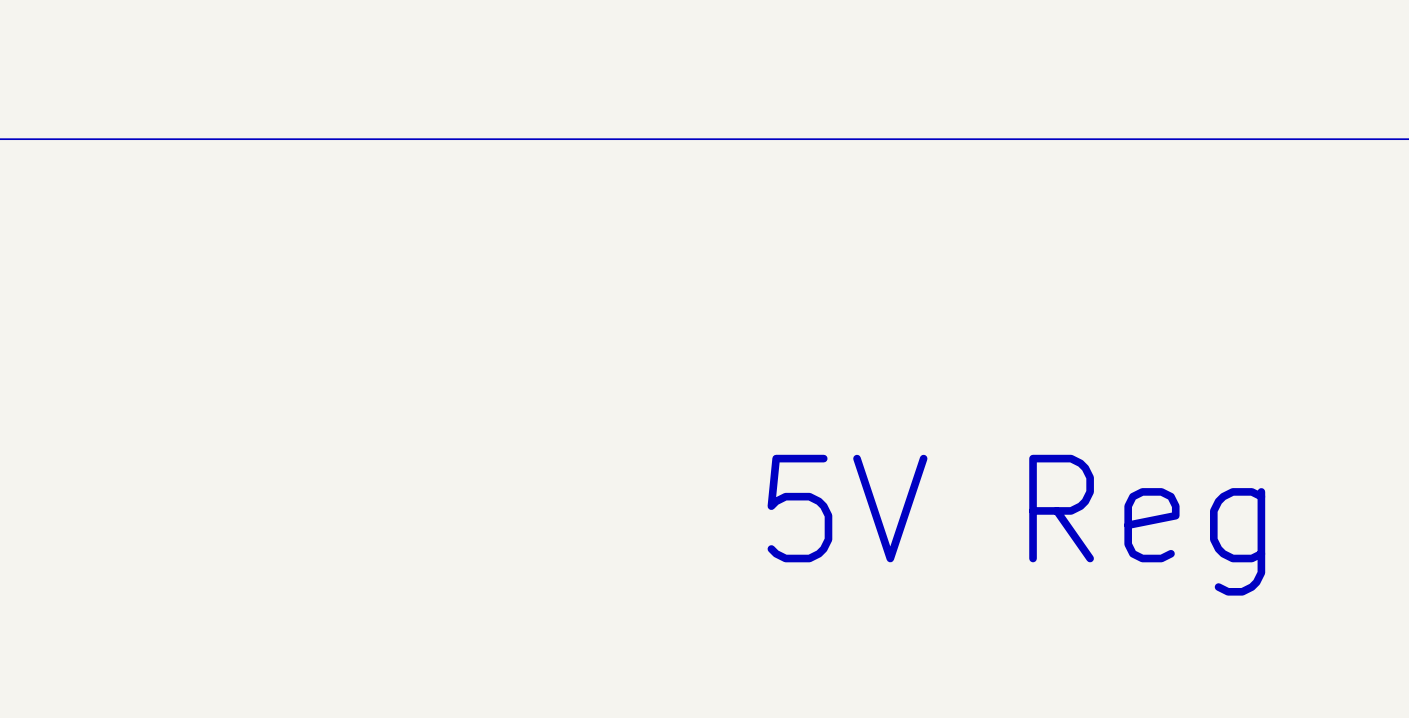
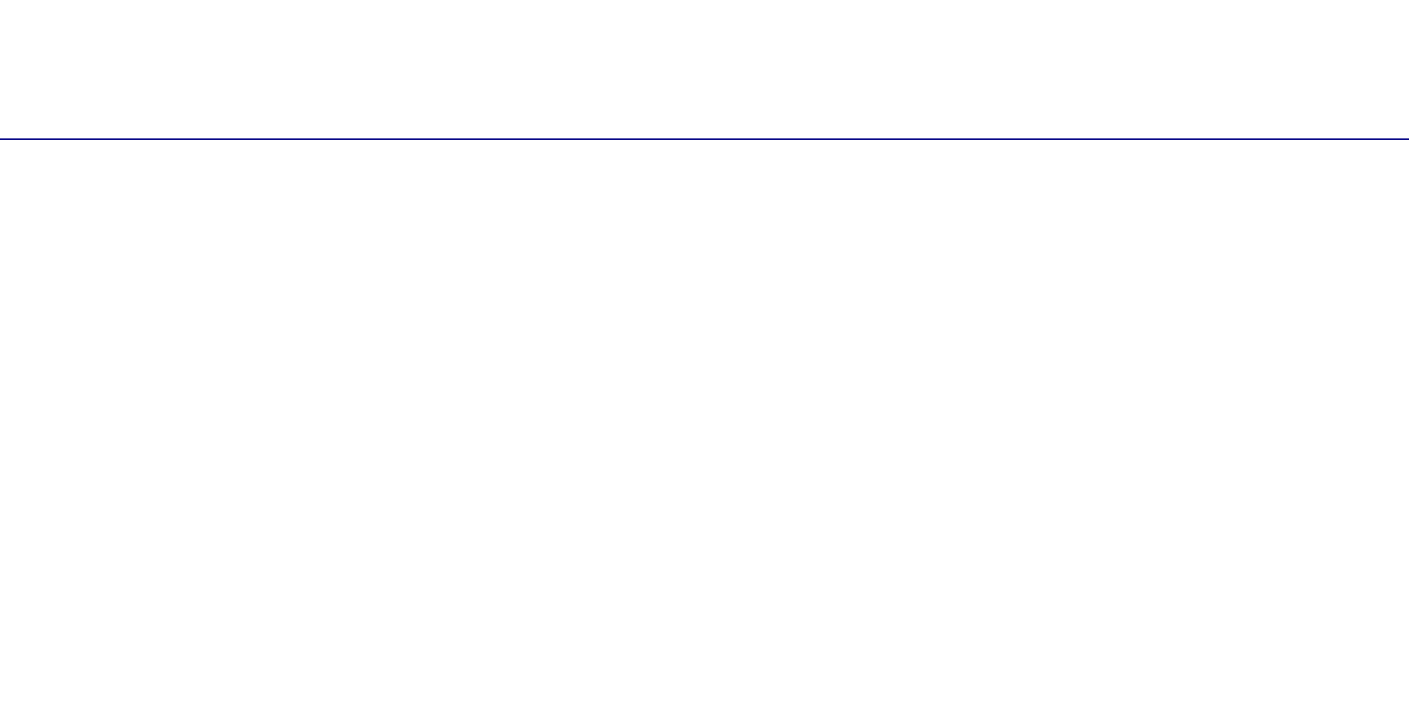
text: 5V Reg (1016, 525) -> none

